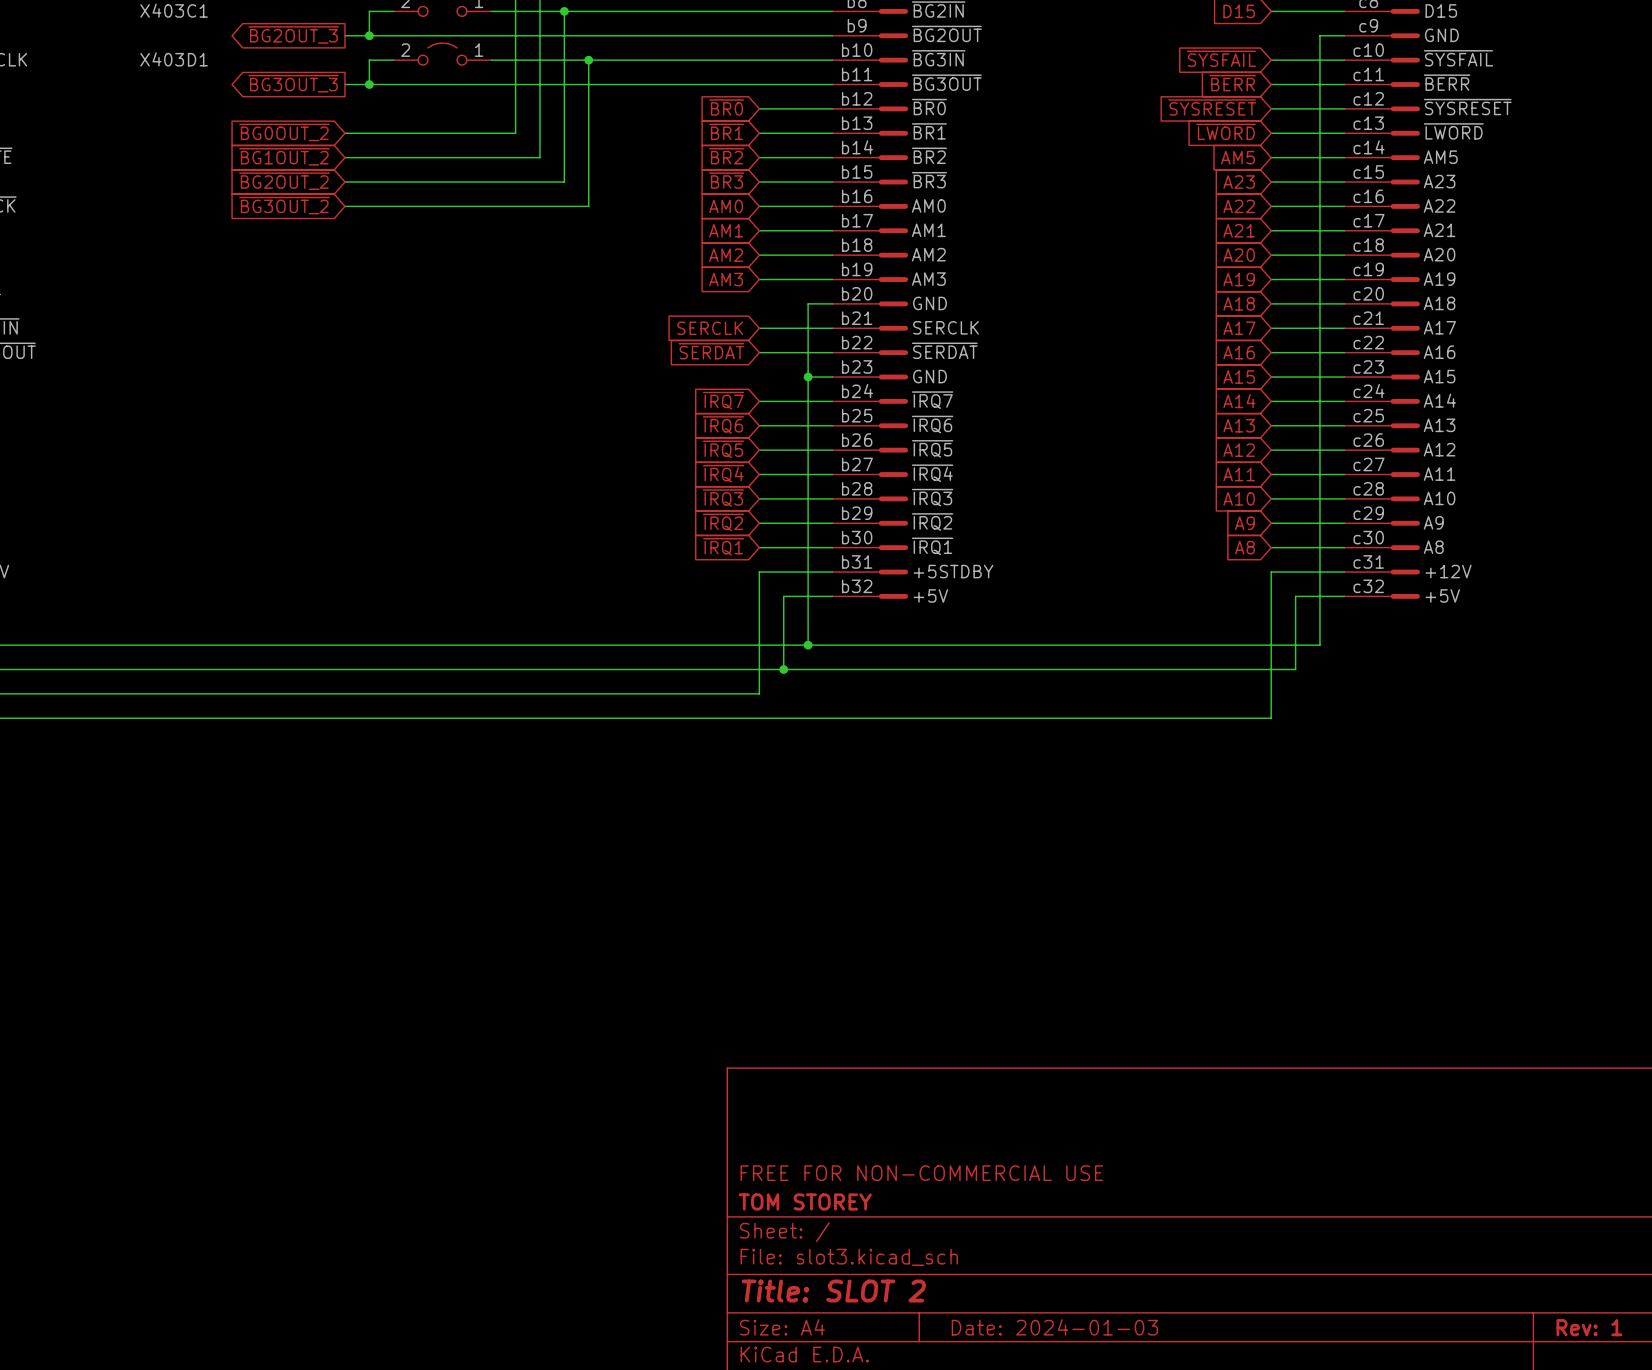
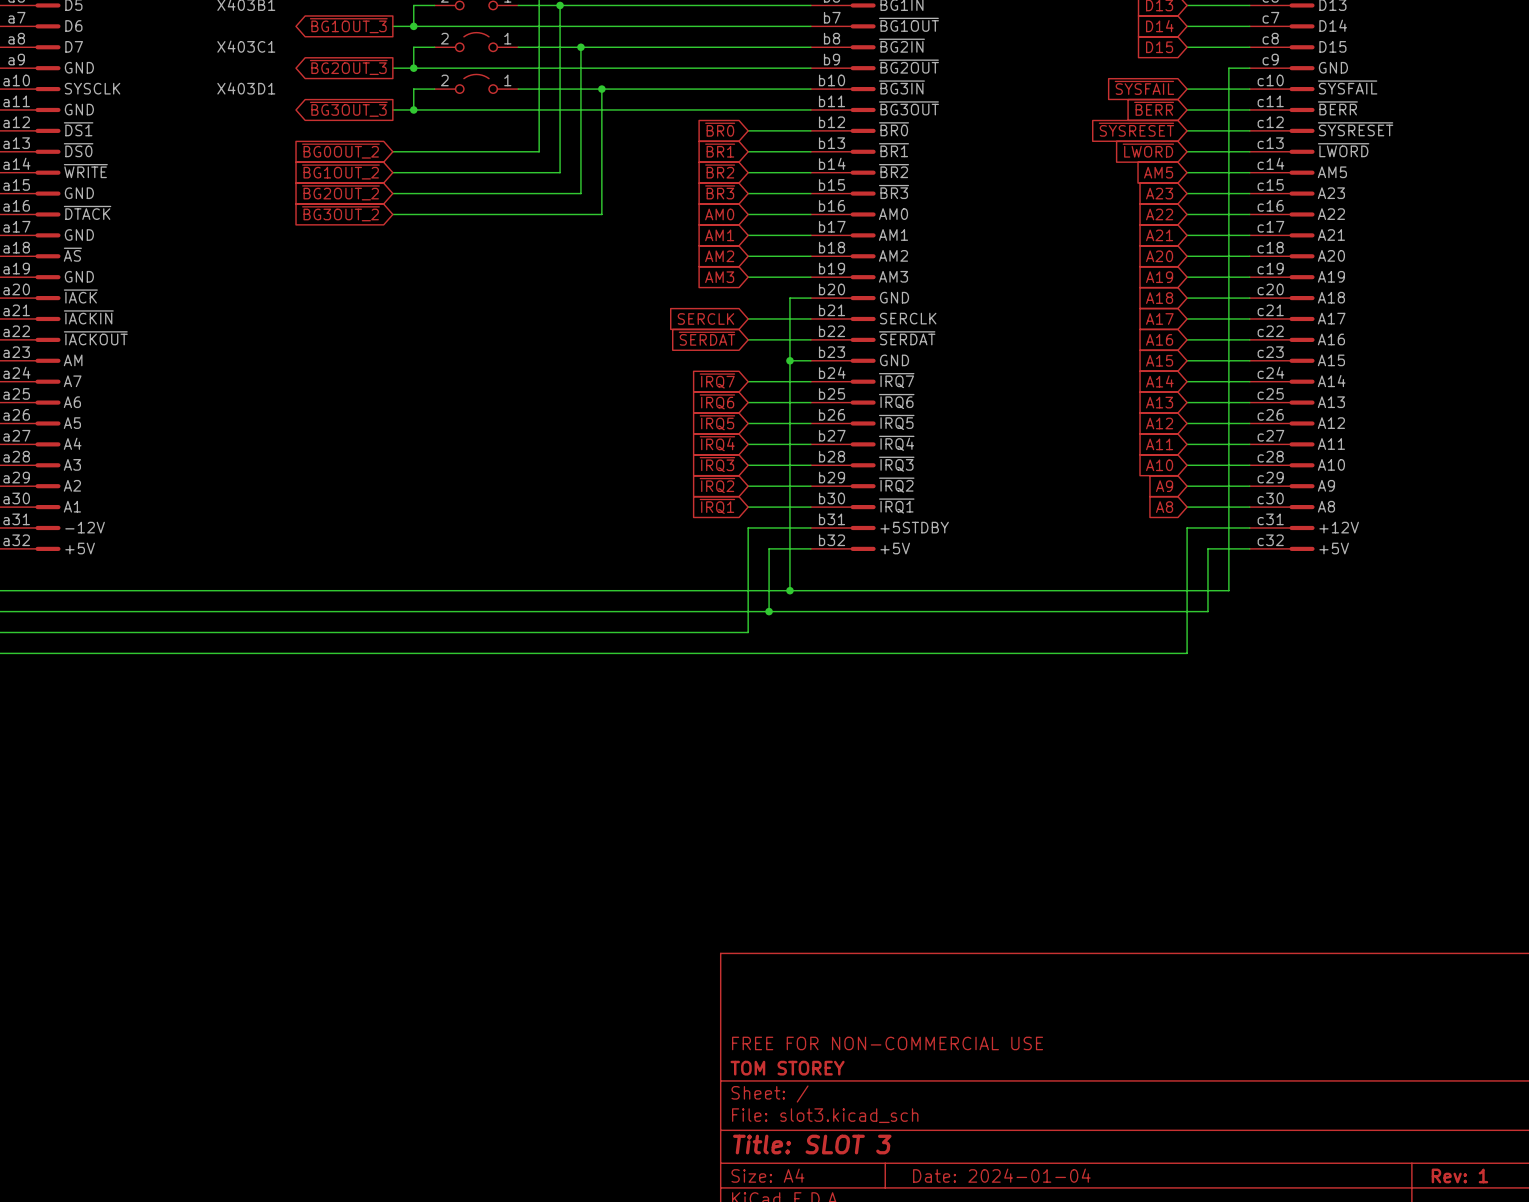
title block: Title: SLOT 2 (833, 1291) -> Title: SLOT 3 (812, 1144)
title block: Date: 2024-01-03 (1054, 1327) -> Date: 2024-01-04 (1001, 1175)

